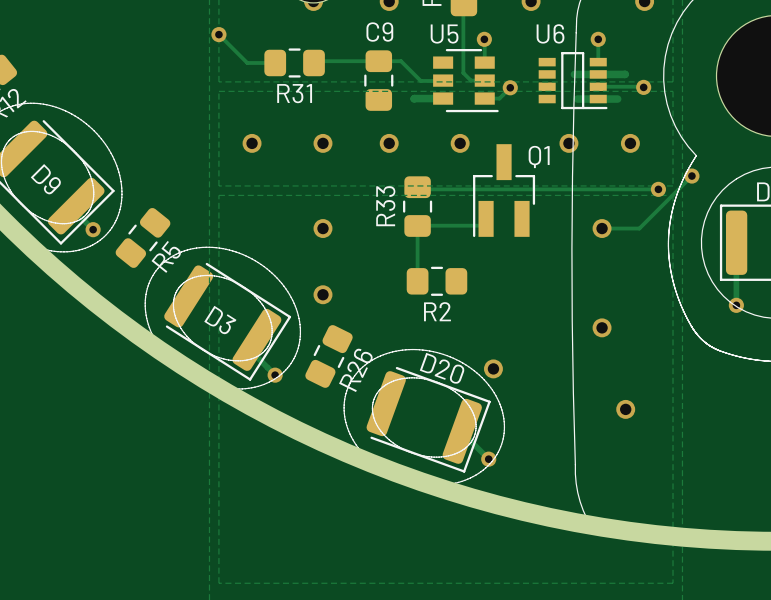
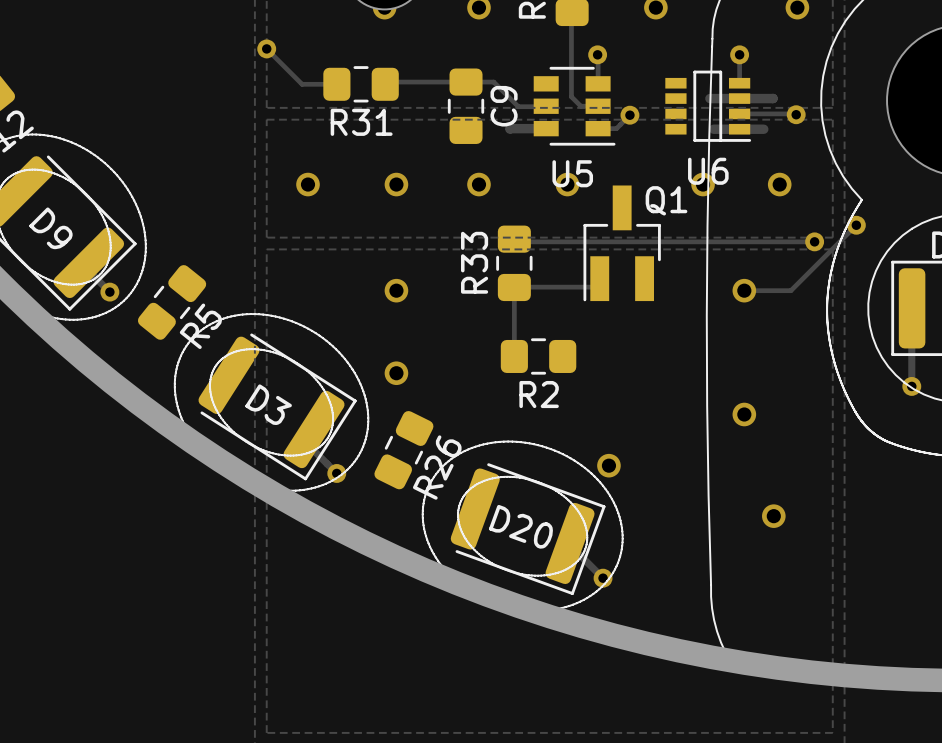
C9 name rotation: 0° (379, 32) -> 90° counterclockwise (504, 106)
C9 name position: C9 (379, 32) -> C9 (504, 106)
U6 name position: U6 (550, 33) -> U6 (708, 171)
U5 name position: U5 (444, 34) -> U5 (572, 173)
D20 name position: D20 (442, 368) -> D20 (520, 526)

